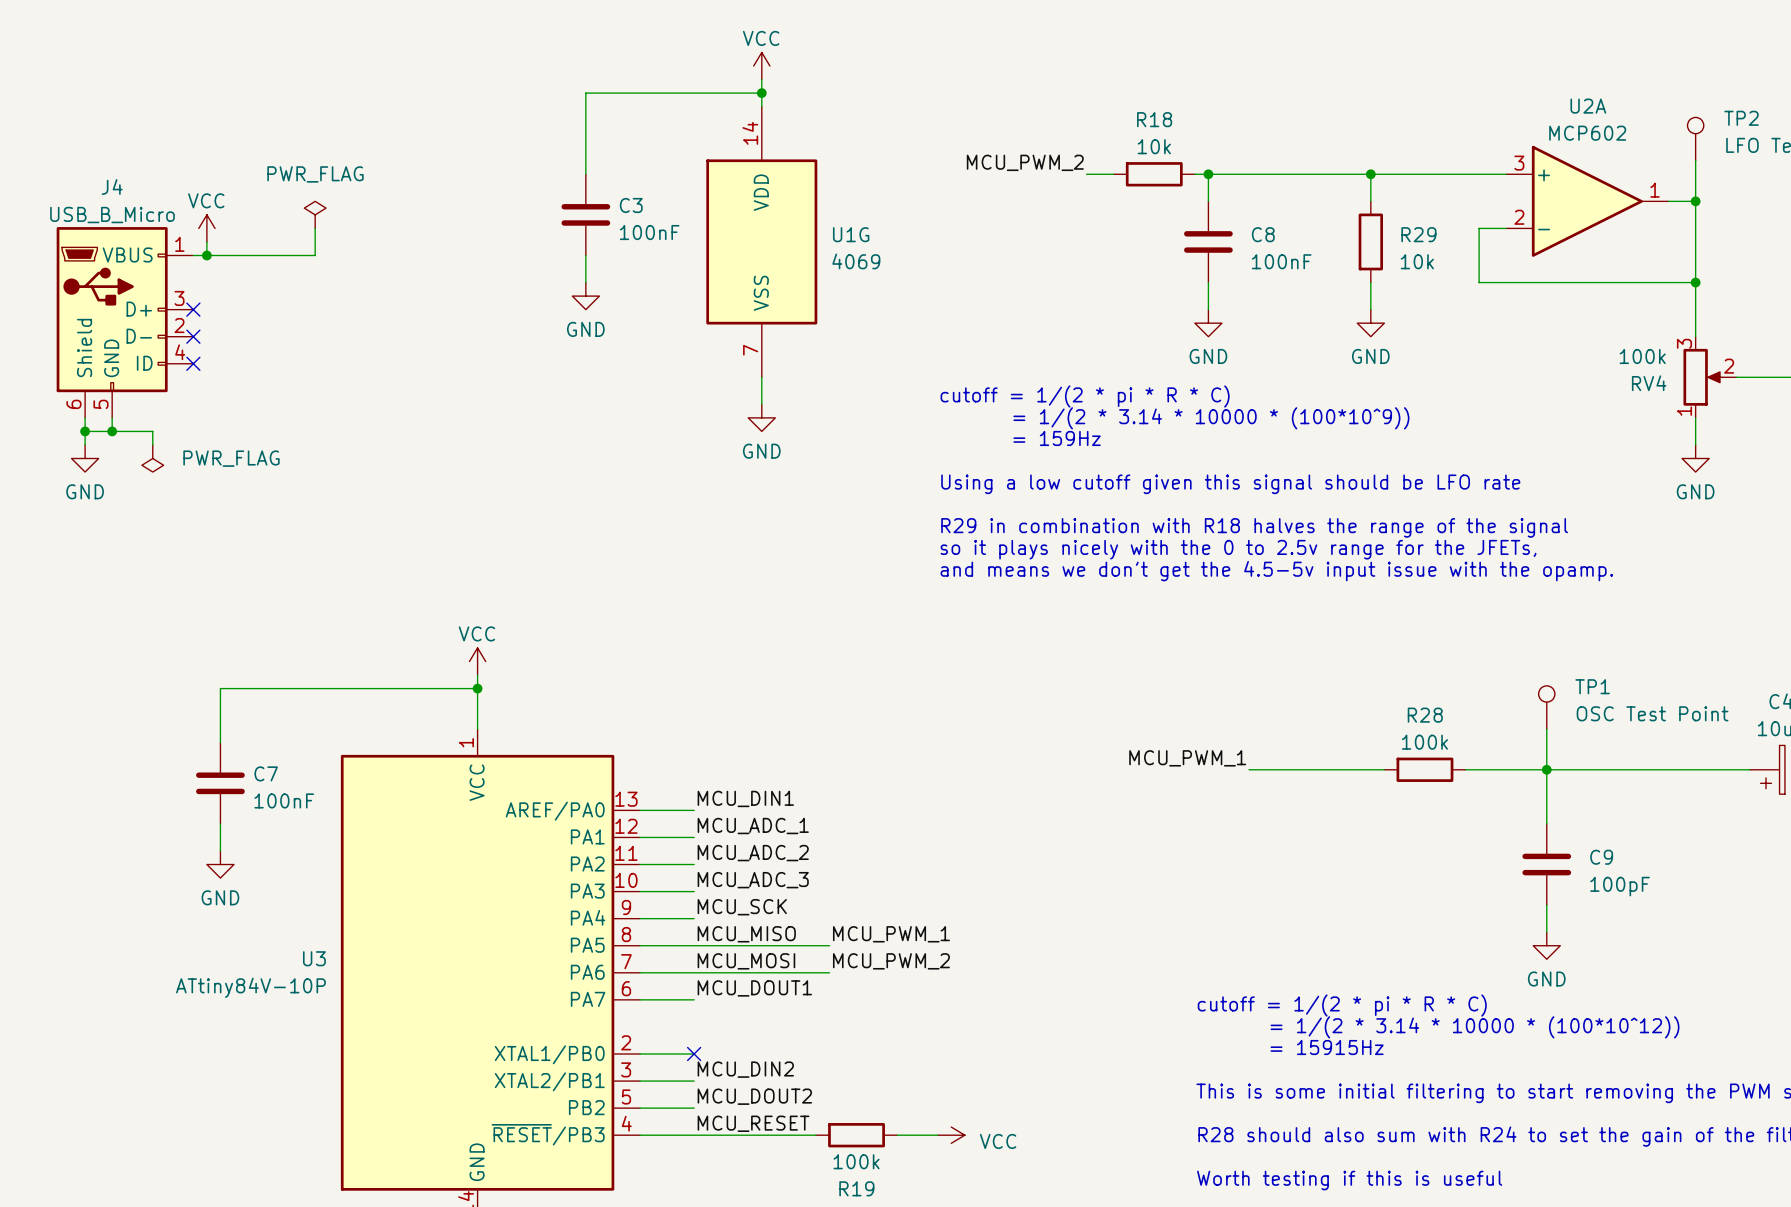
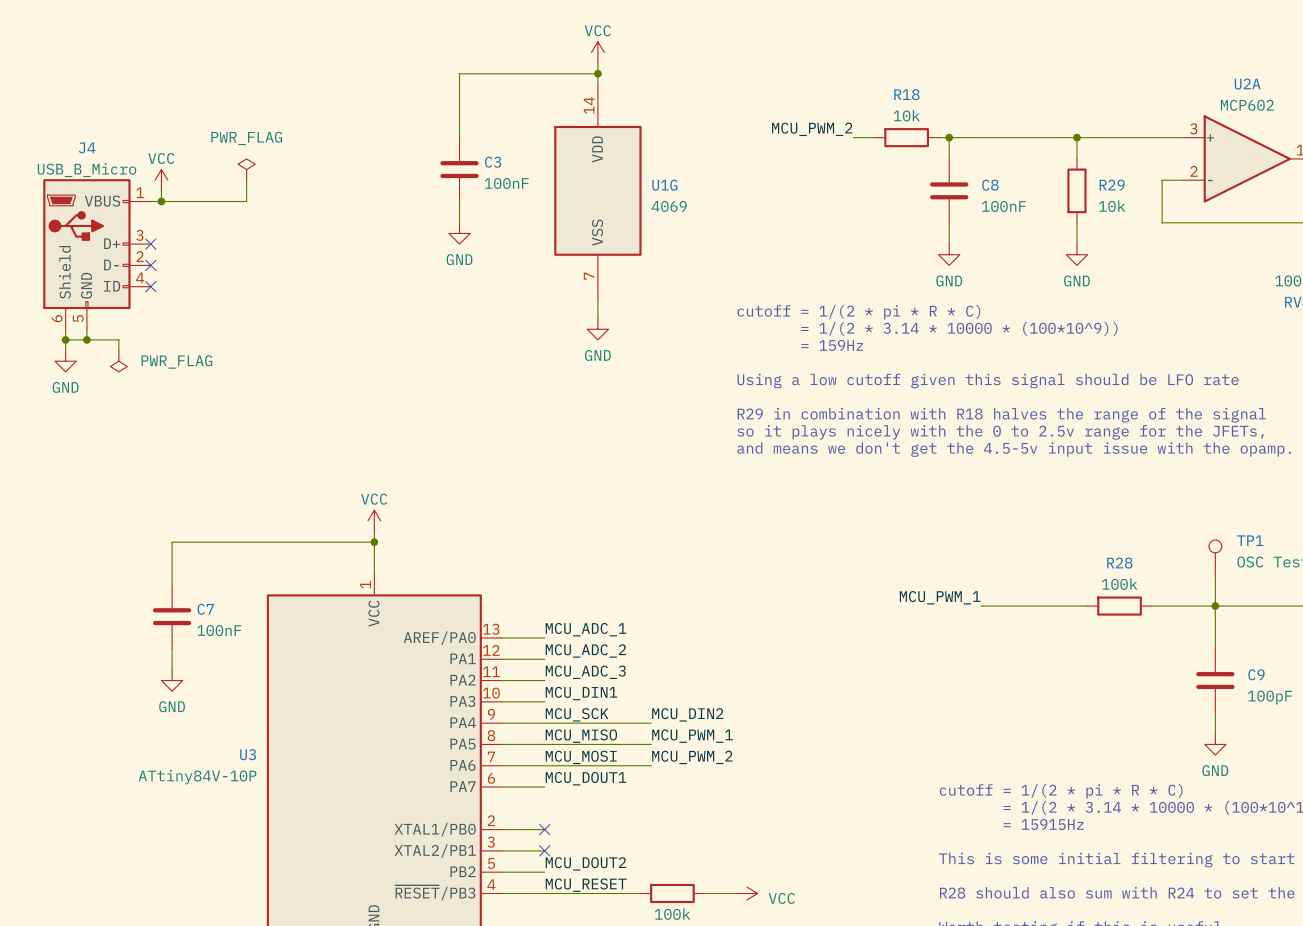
label: MCU_DIN1 (745, 798) -> MCU_ADC_1 (586, 629)
label: MCU_ADC_1 (753, 826) -> MCU_ADC_2 (585, 650)
label: MCU_ADC_2 (753, 853) -> MCU_ADC_3 (585, 672)
label: MCU_ADC_3 (753, 880) -> MCU_DIN1 (581, 693)
wire: none -> (544, 723) (651, 723)
label position: MCU_DIN2 (745, 1069) -> MCU_DIN2 (687, 714)
no-connect mark: none -> (544, 850)

